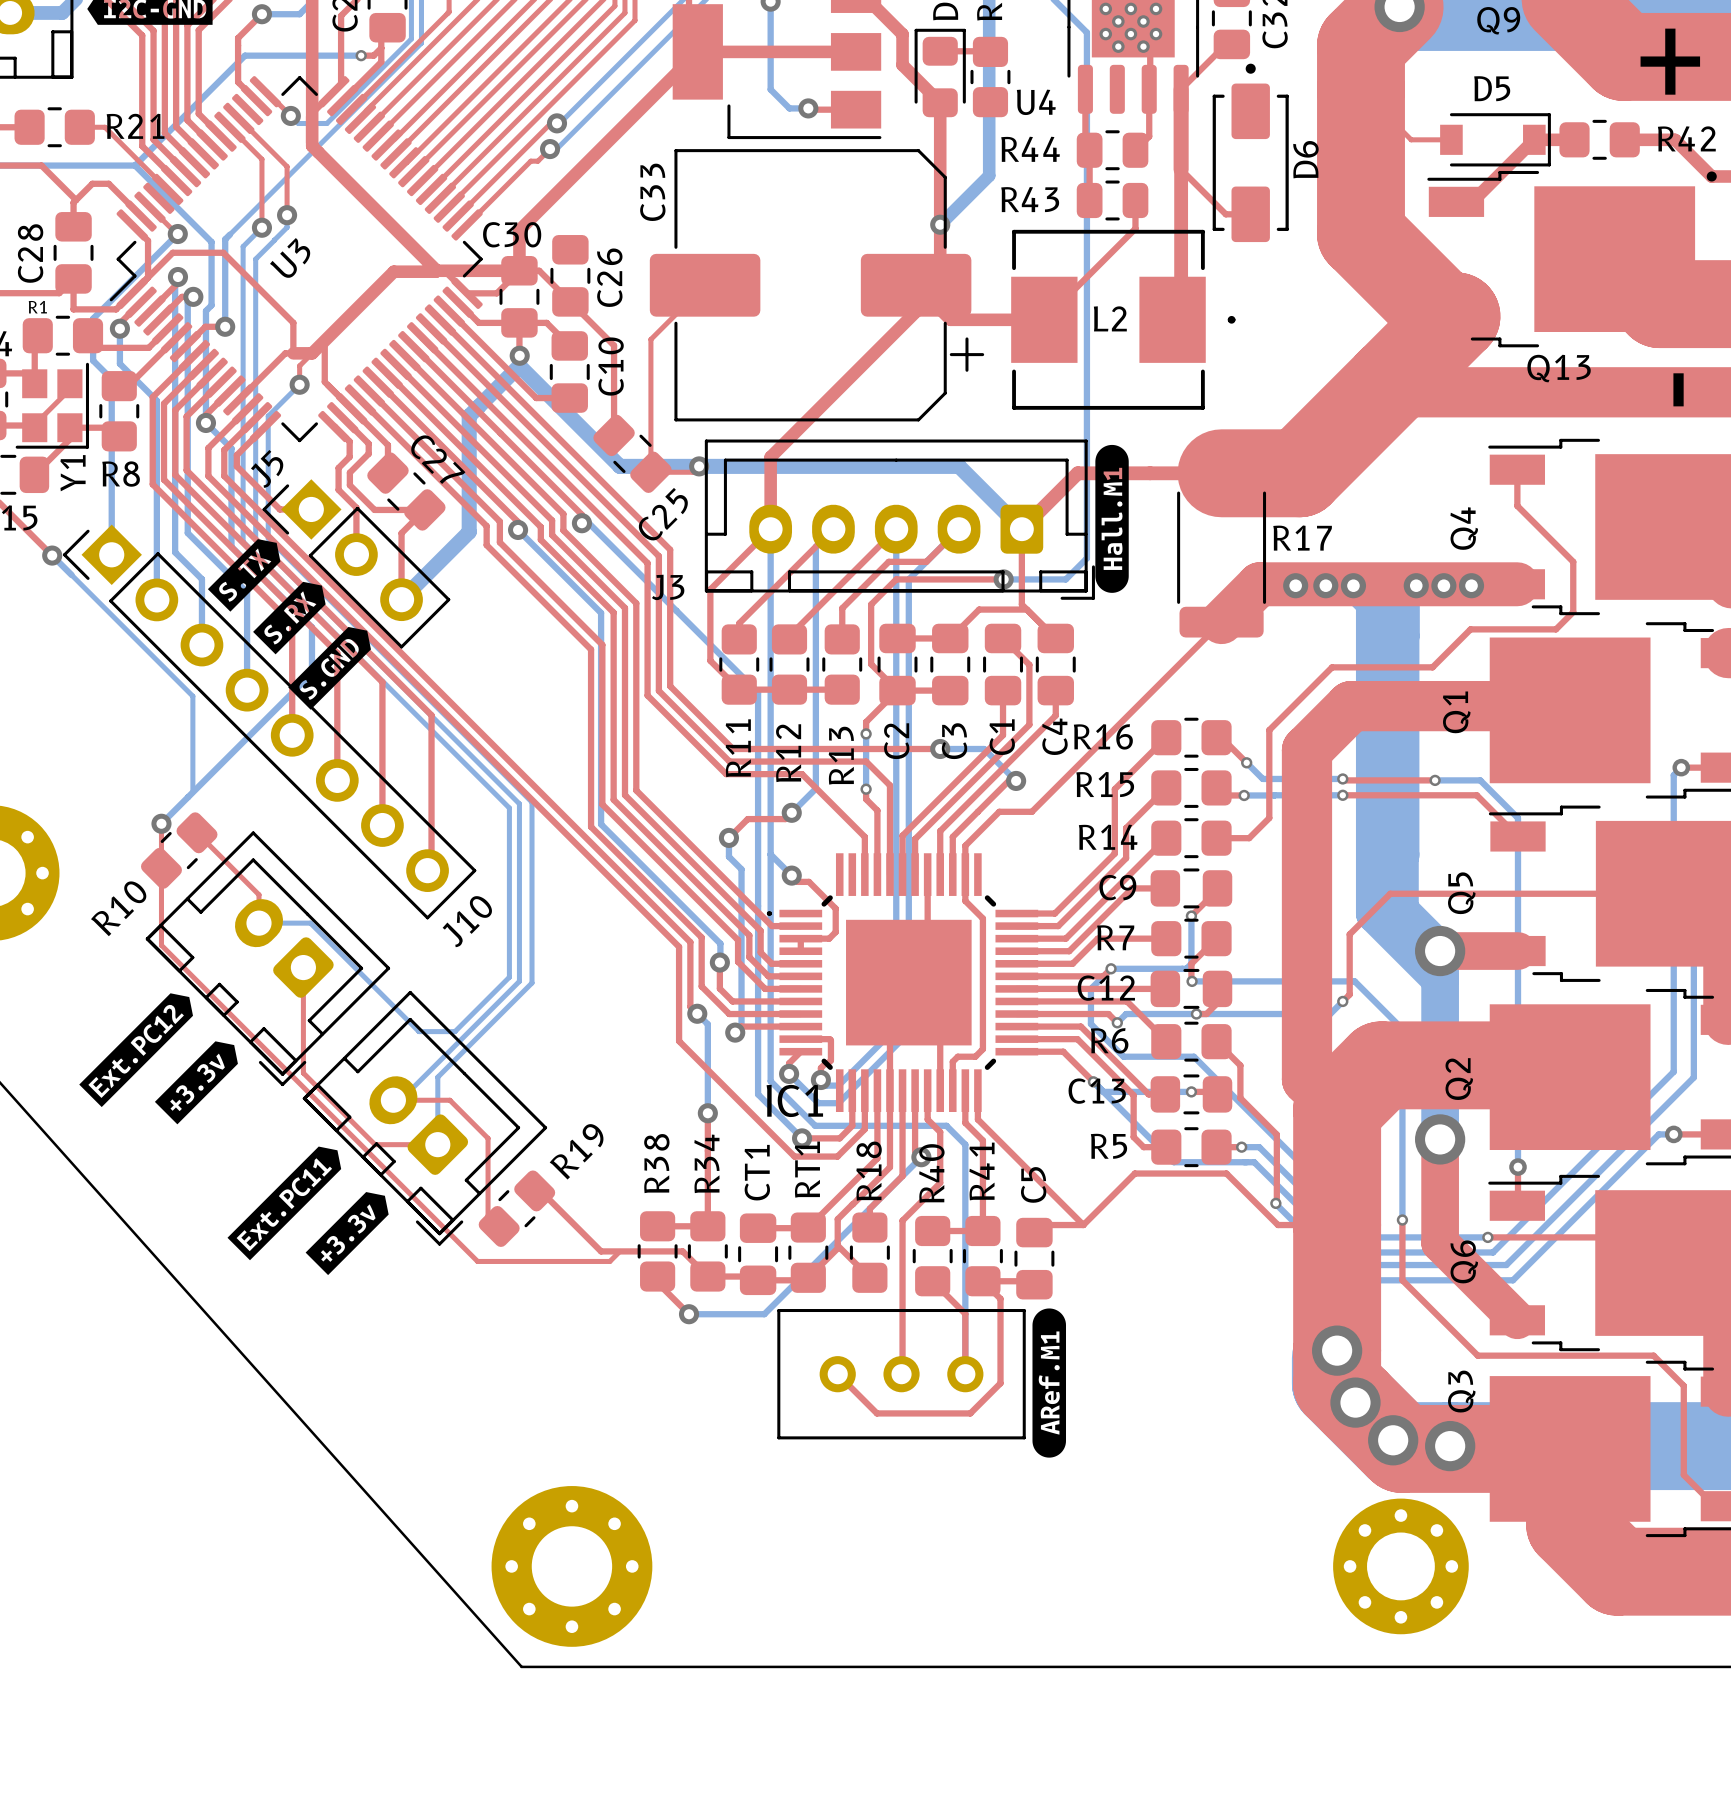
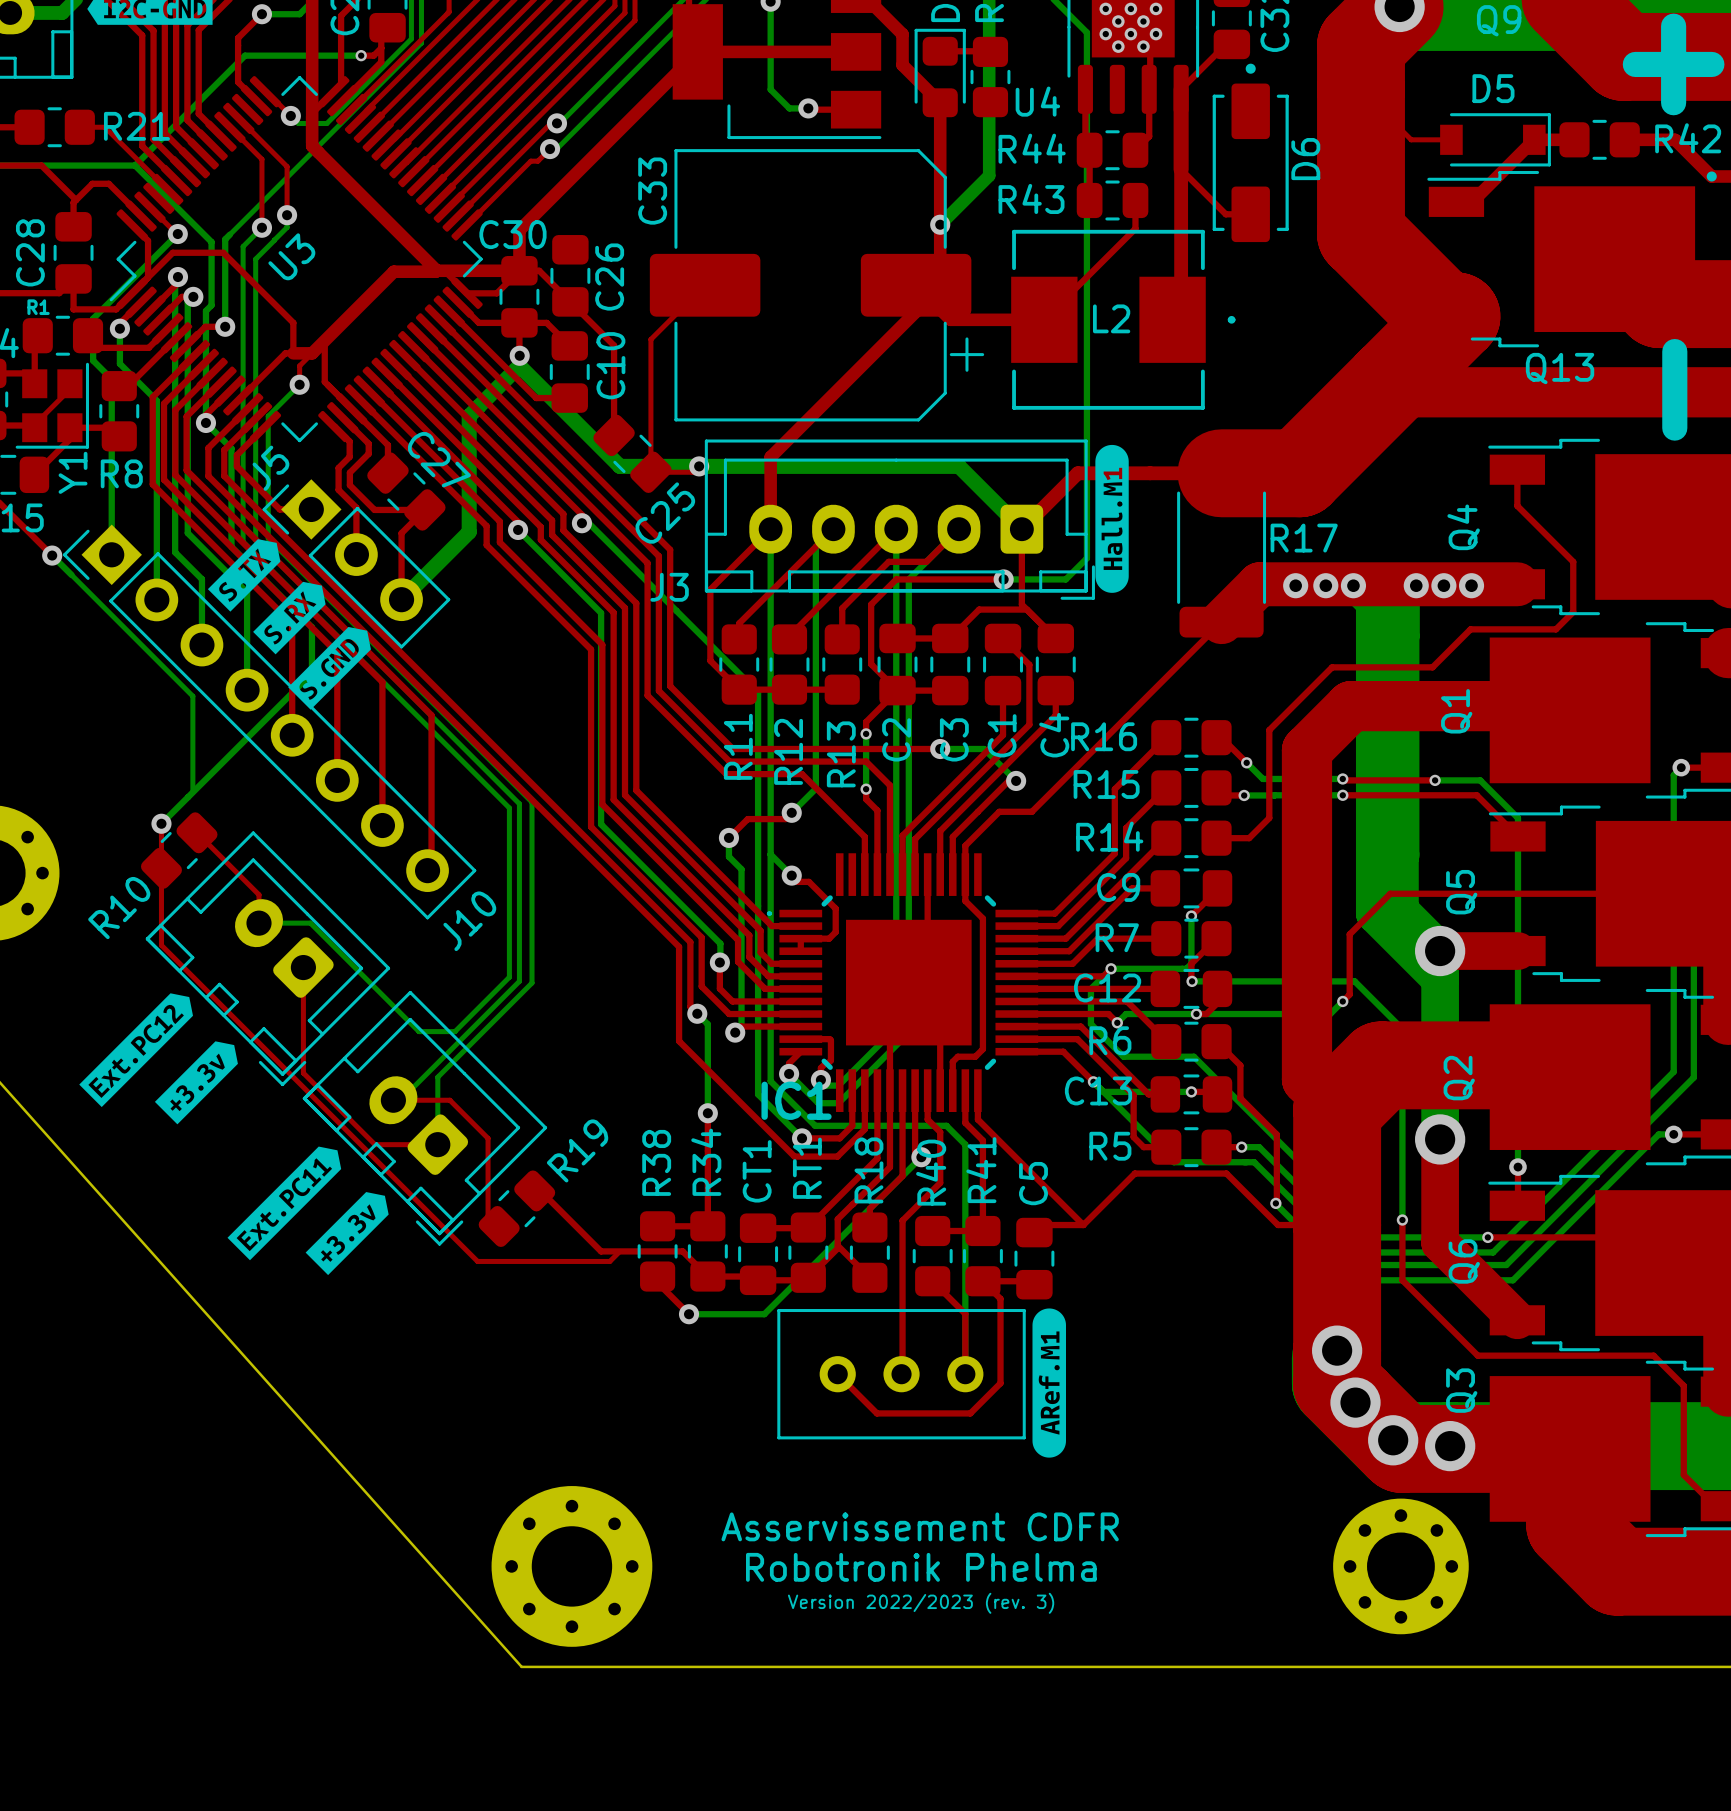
text: none -> Asservissement CDFR (920, 1526)
text: none -> Robotronik Phelma (921, 1567)
text: none -> Version 2022/2023 (rev. 3) (921, 1603)

